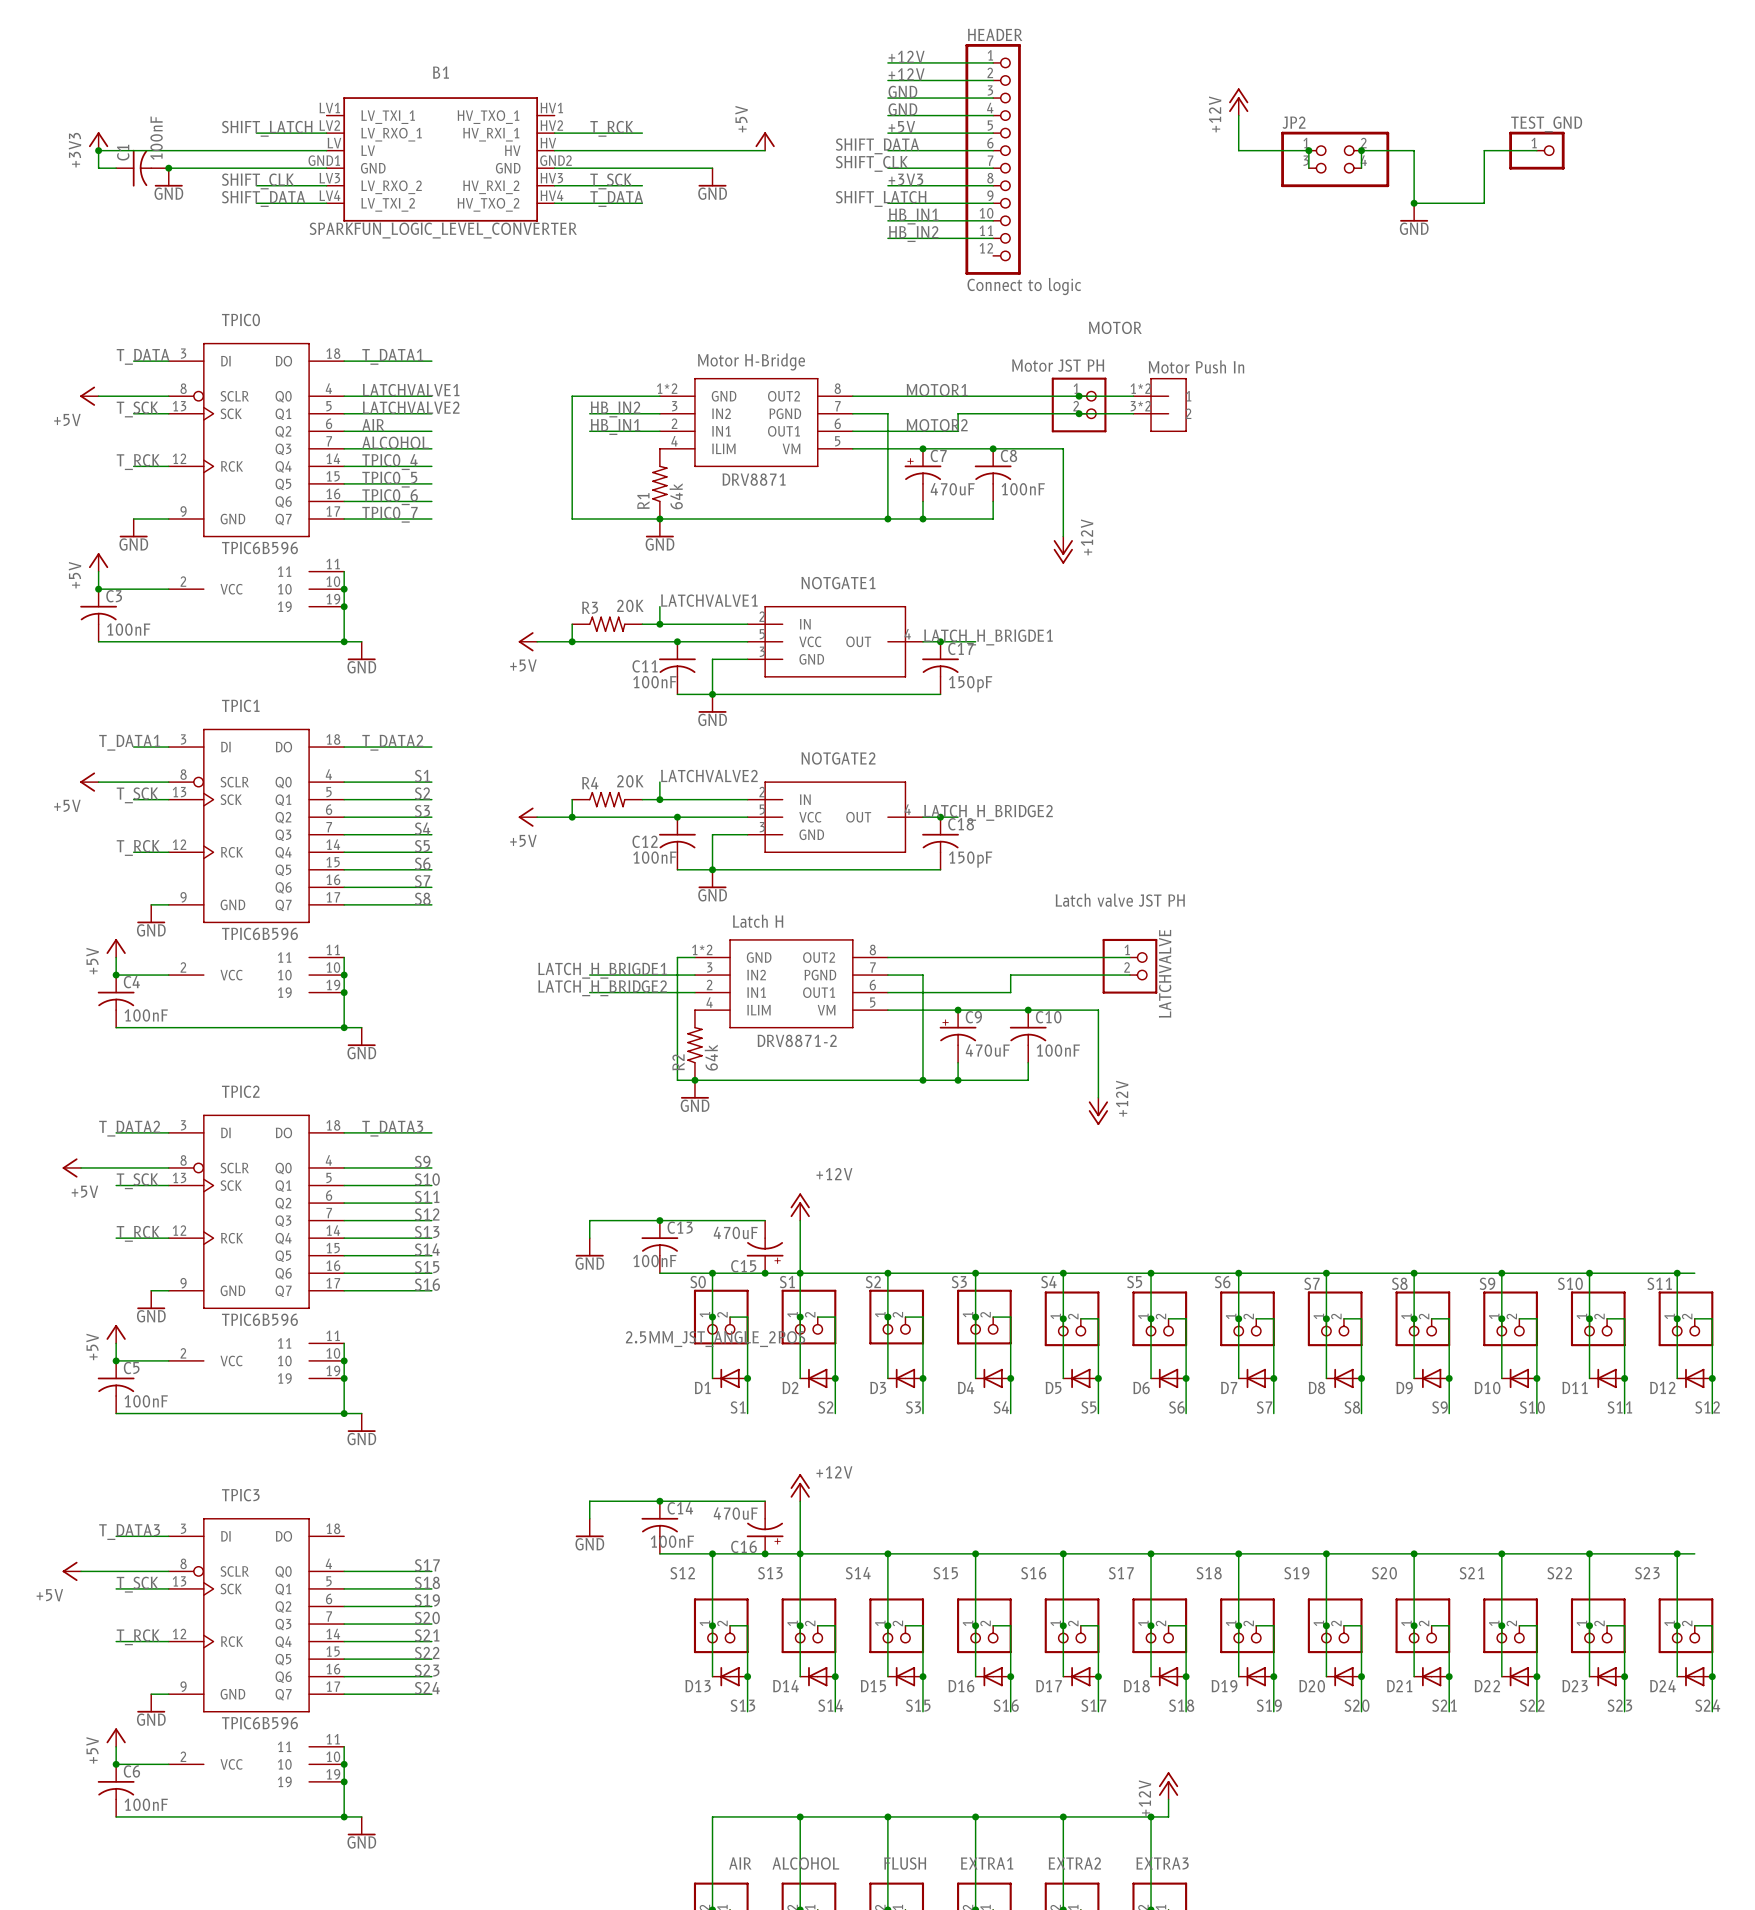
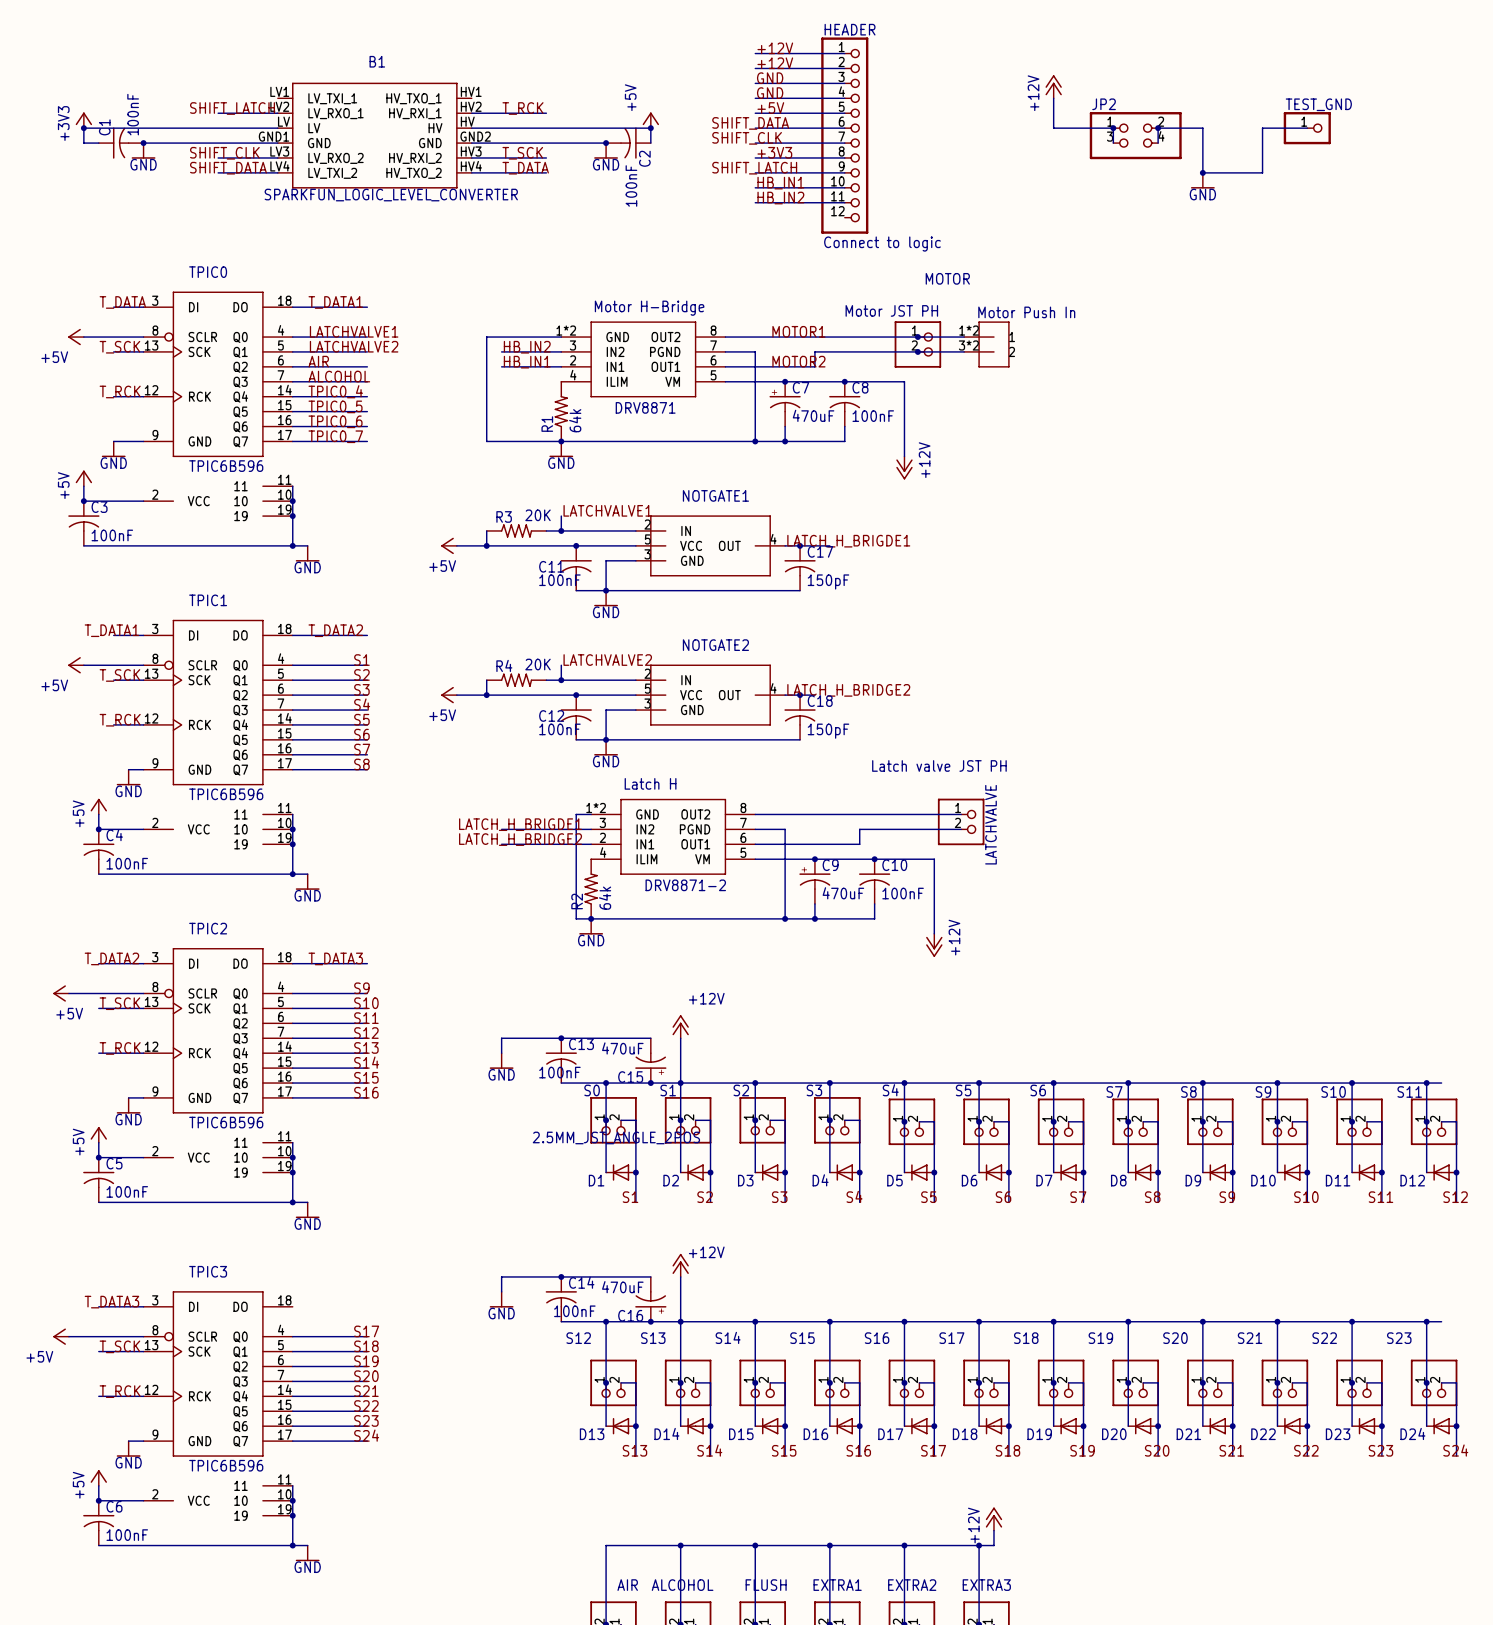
wire: none -> (650, 128) (650, 143)
junction: none -> (650, 128)
junction: none -> (606, 143)
C2: none -> 100nF (628, 143)

